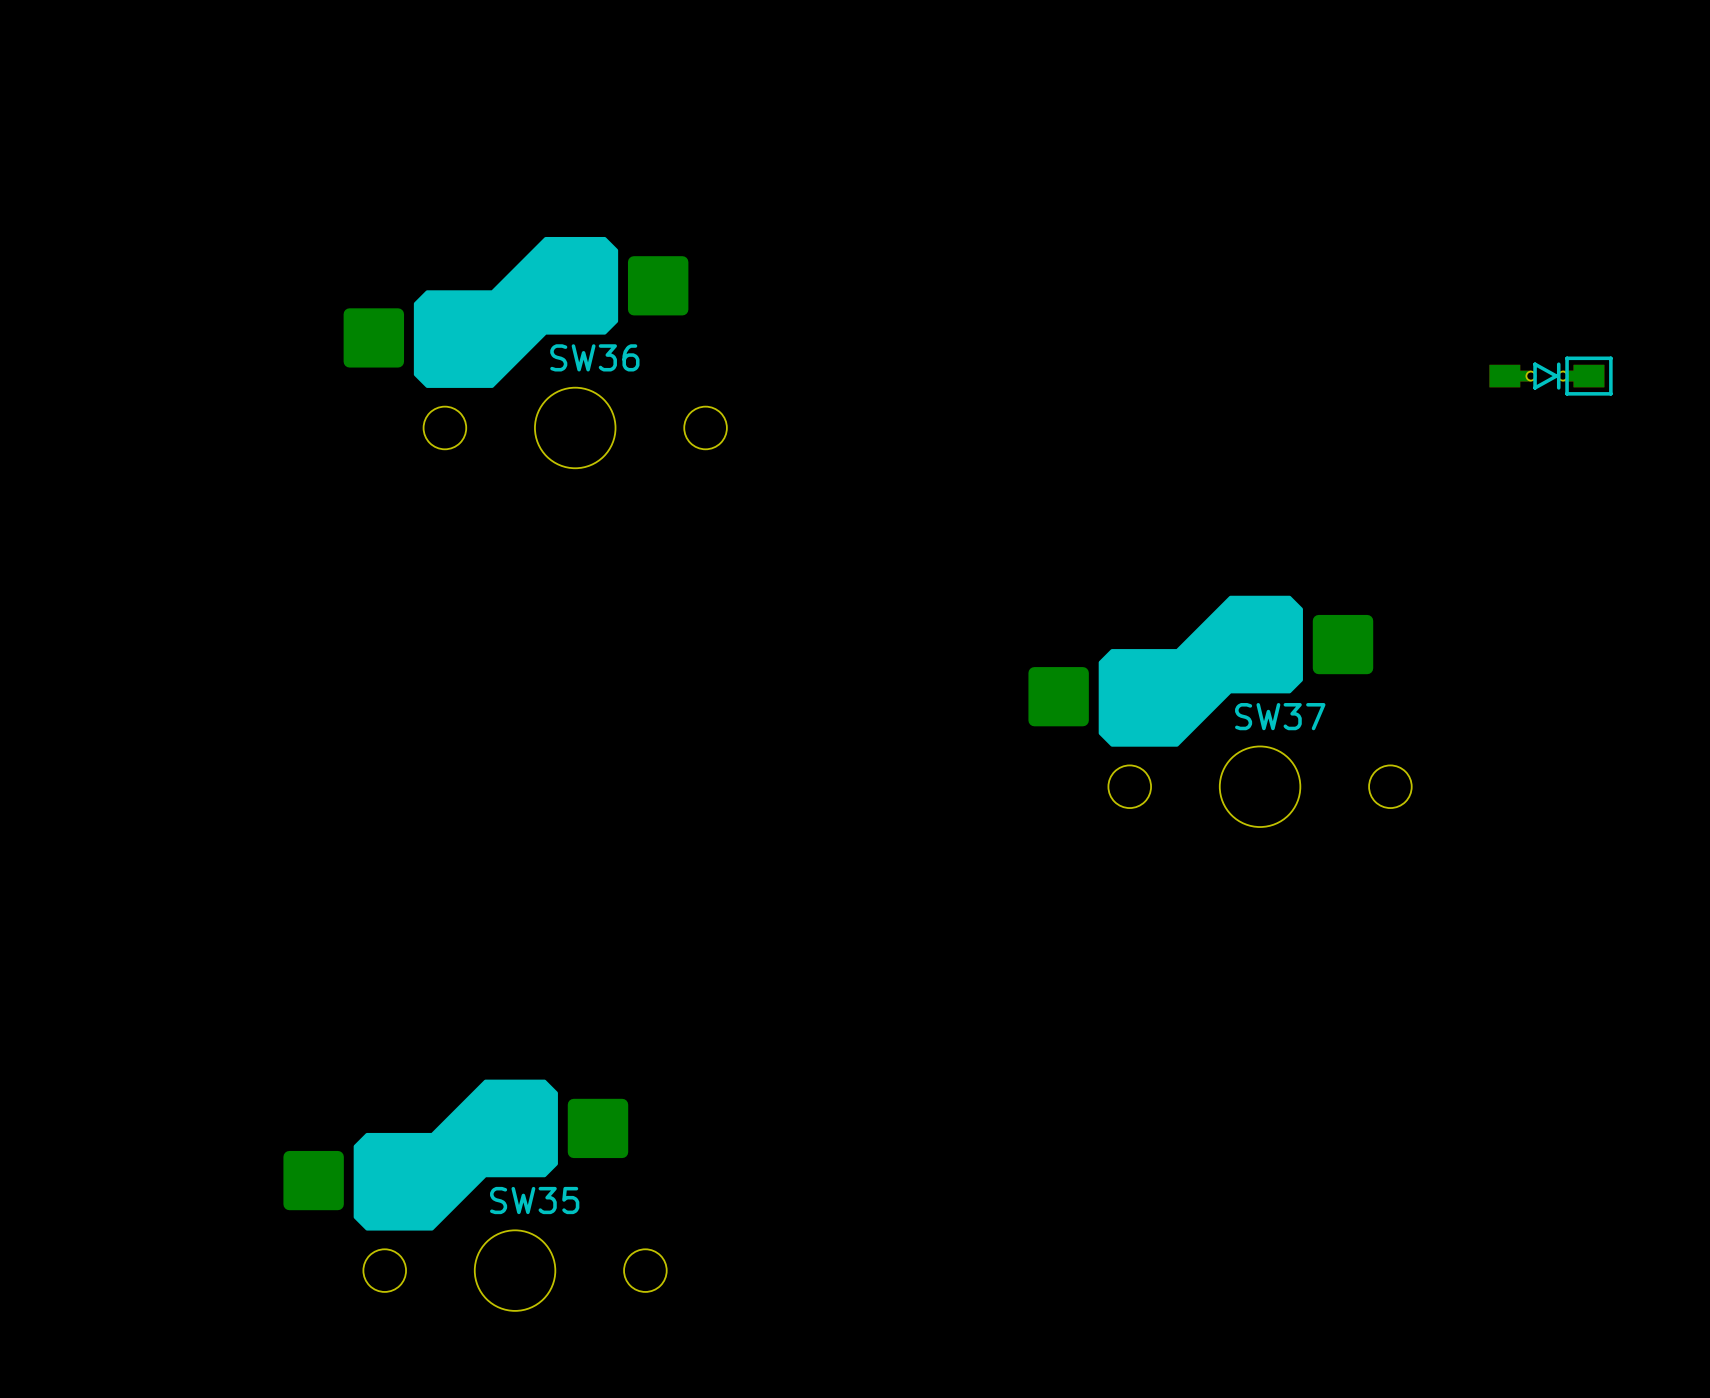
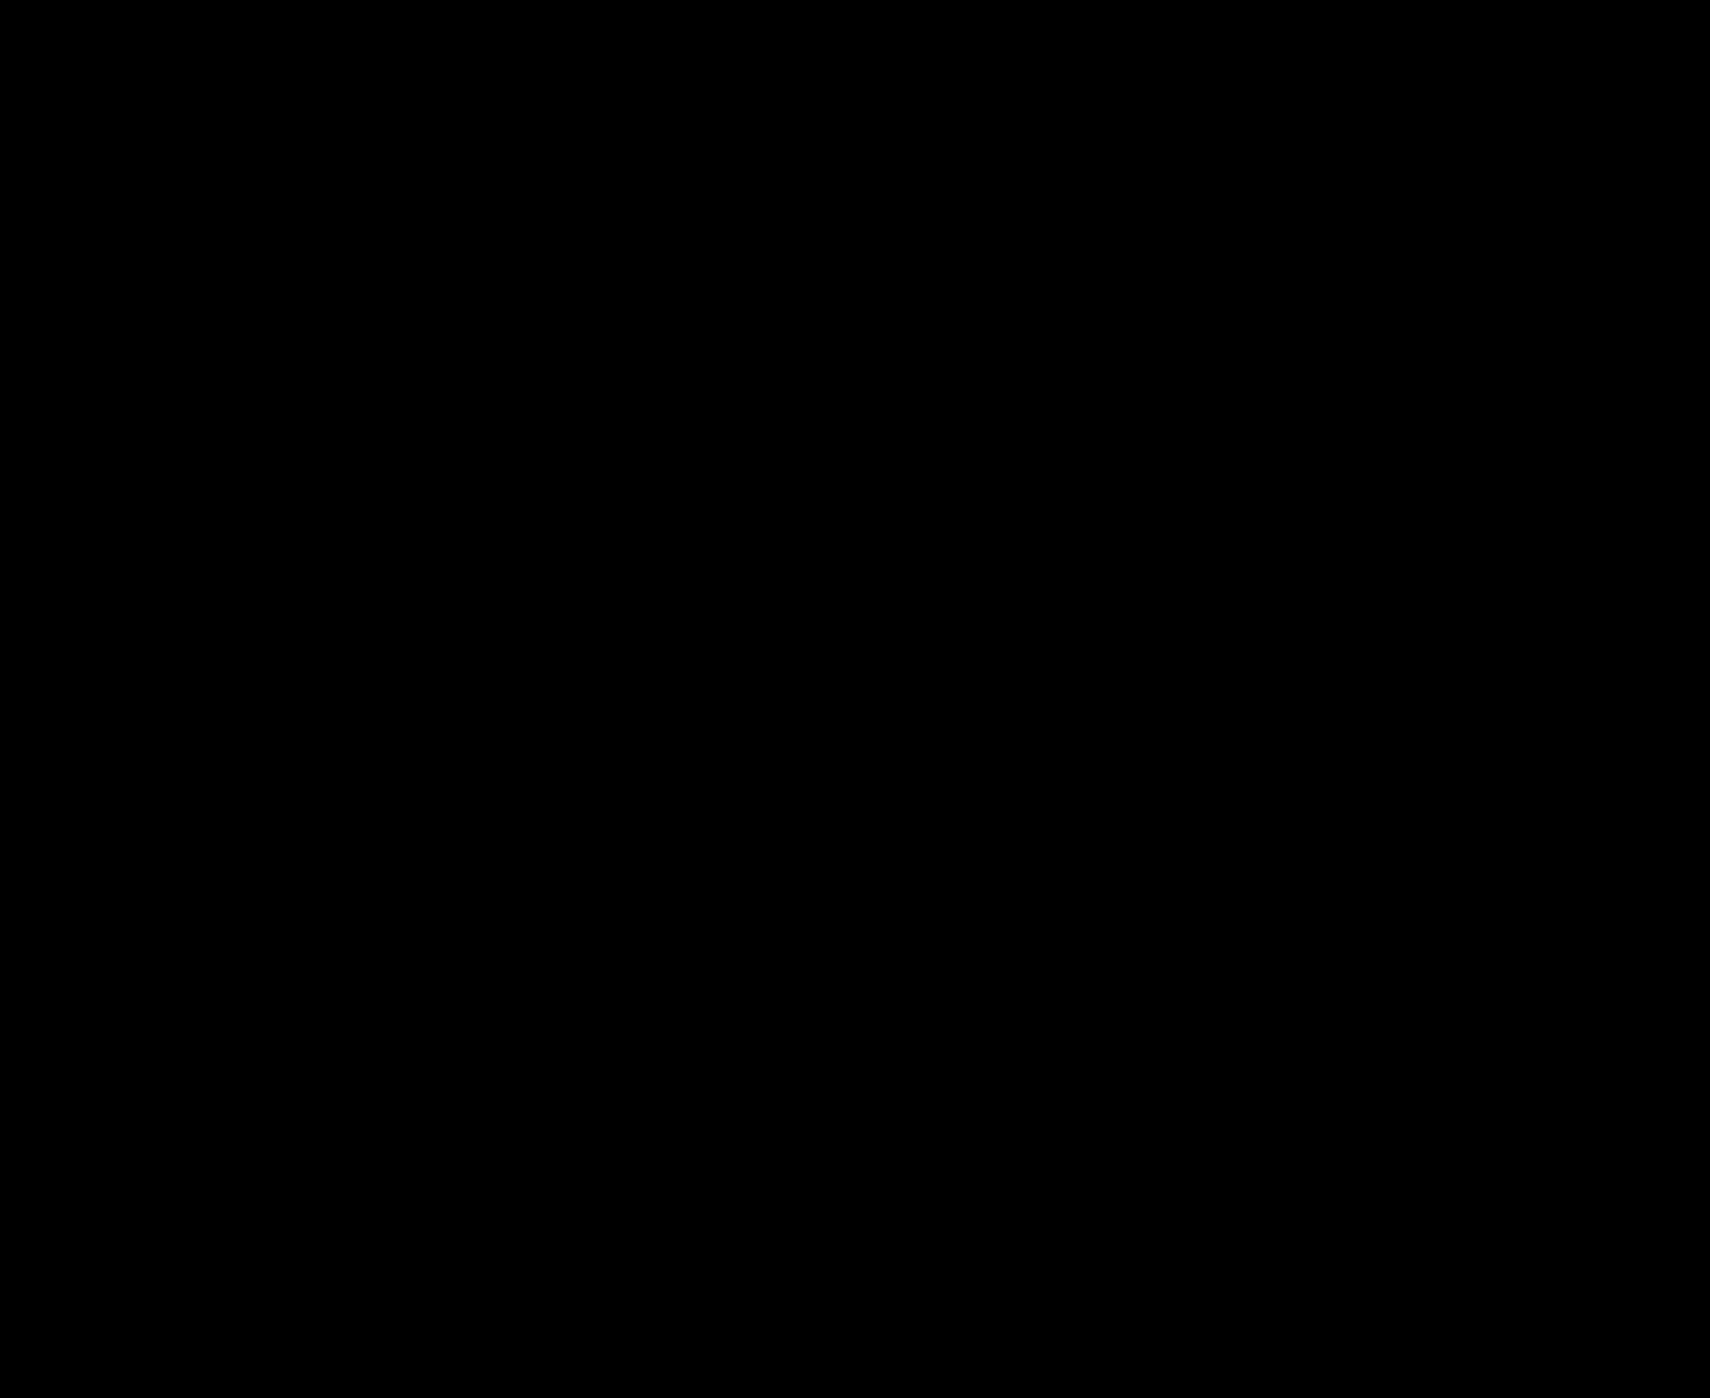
SW36: (535, 352) -> none
part: (1551, 376) -> none
SW37: (1220, 711) -> none
SW35: (475, 1195) -> none

